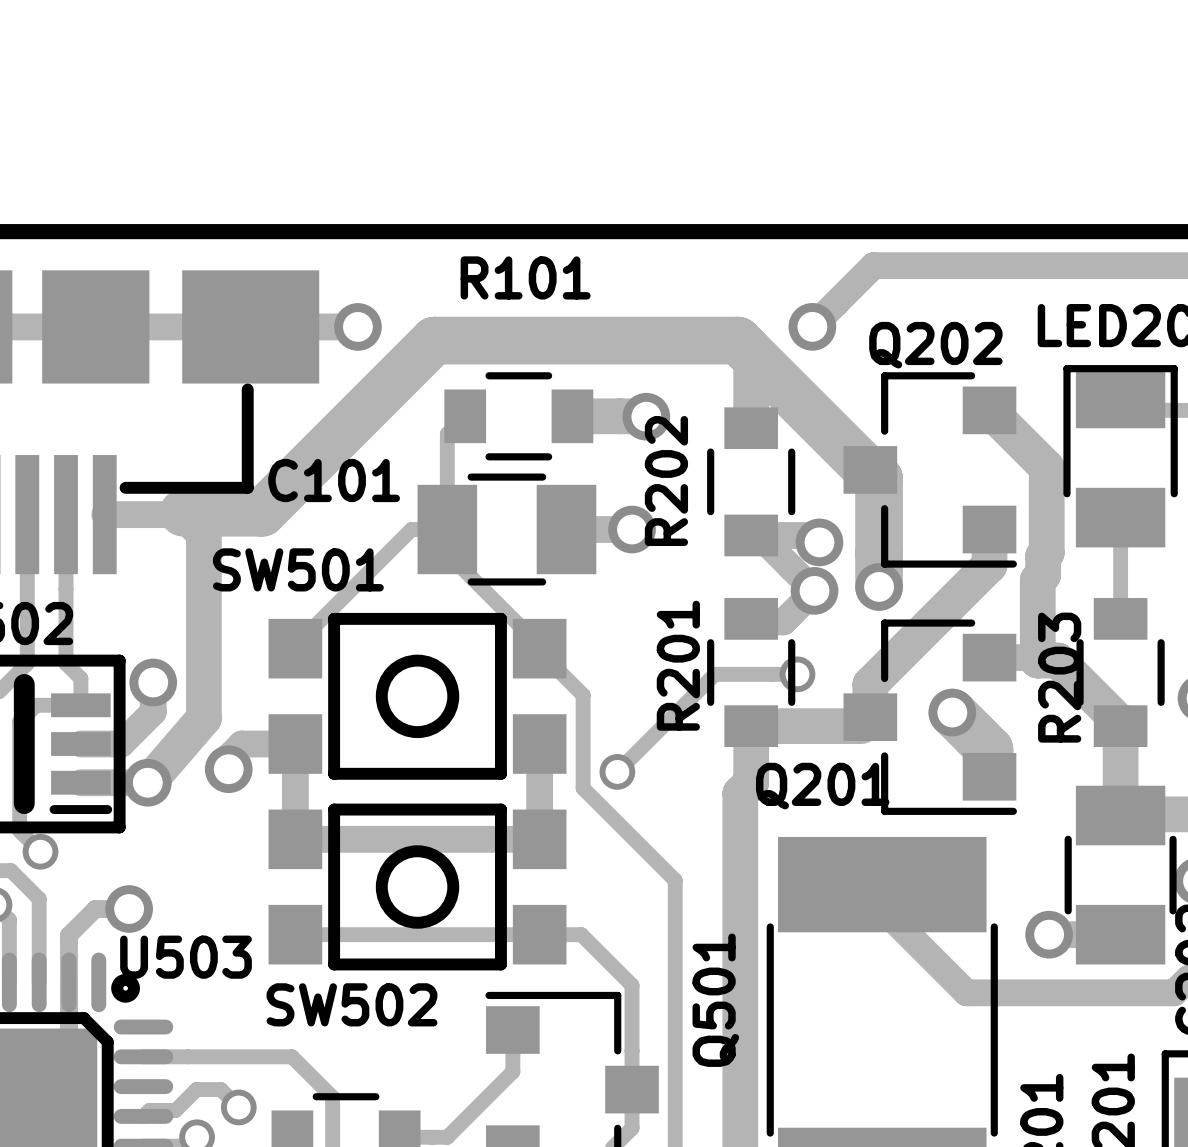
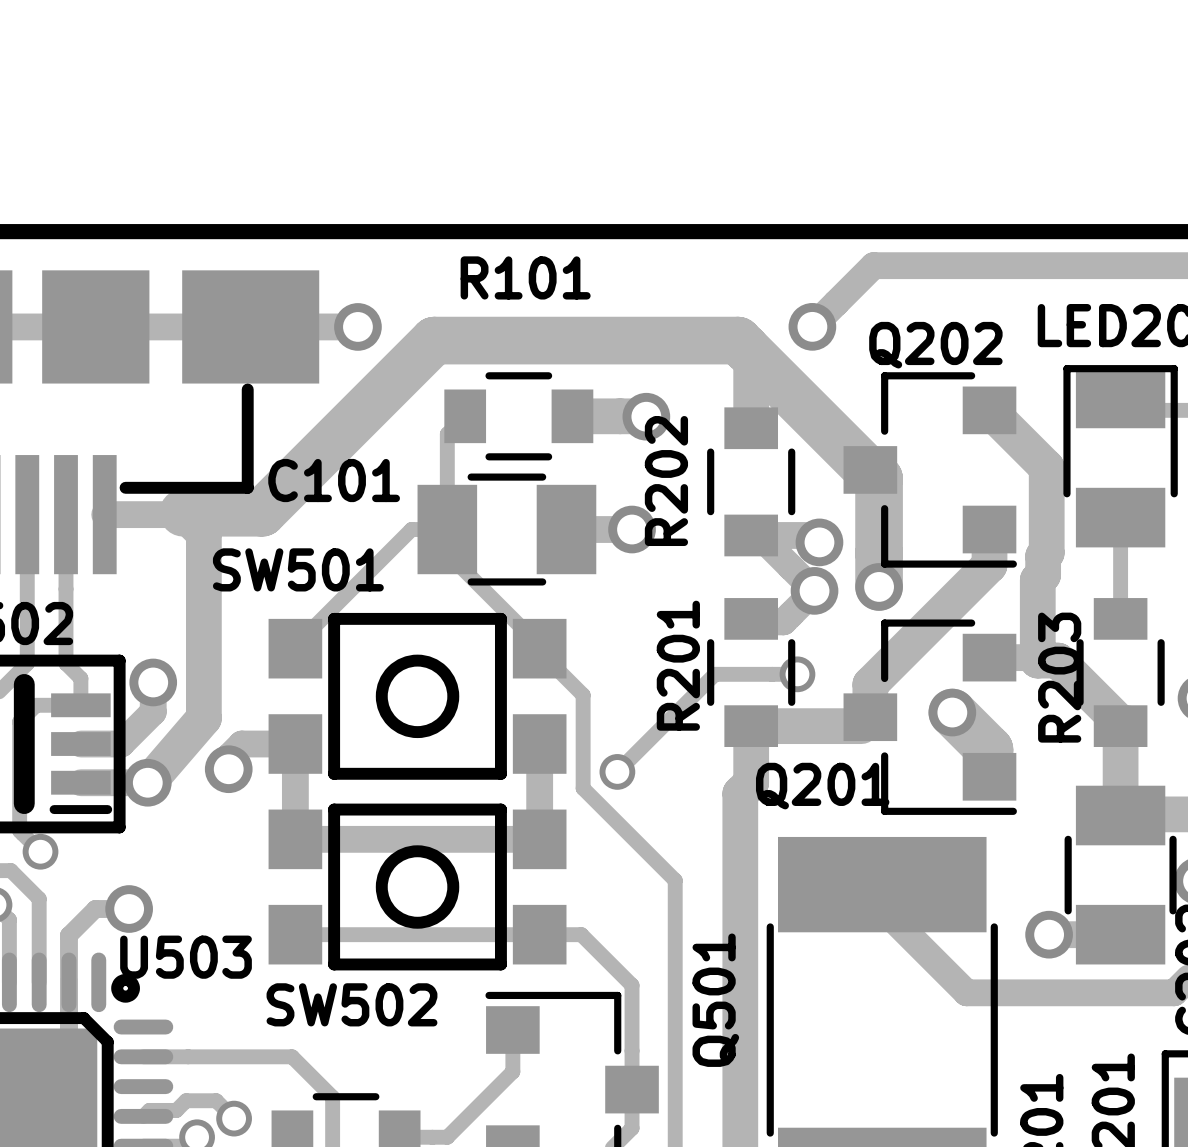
track: (238, 1107) (220, 1089) (196, 1089) (175, 1110) -> (234, 1118) (216, 1100) (186, 1100) (176, 1110)
via position: (238, 1107) -> (234, 1118)

